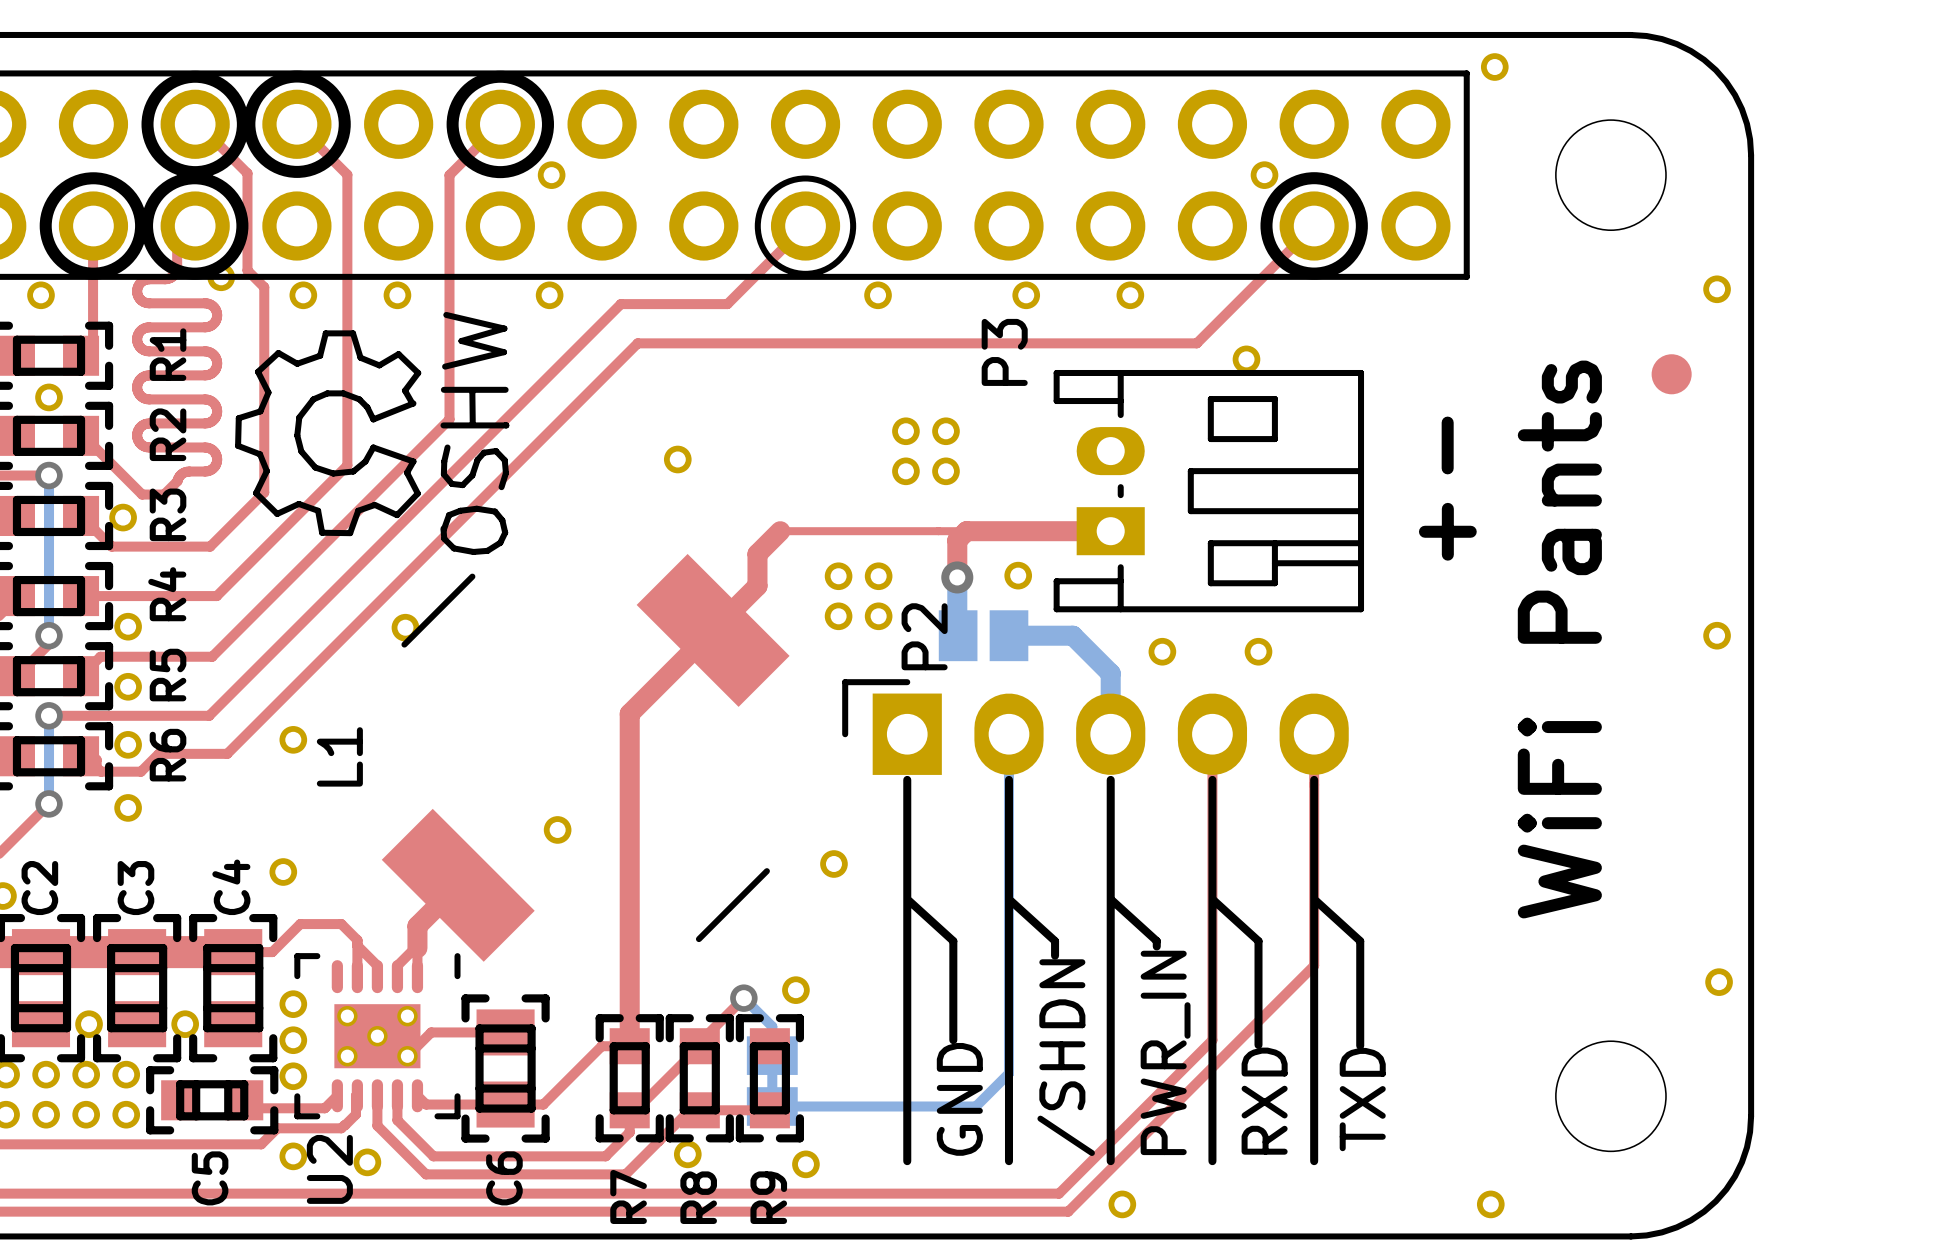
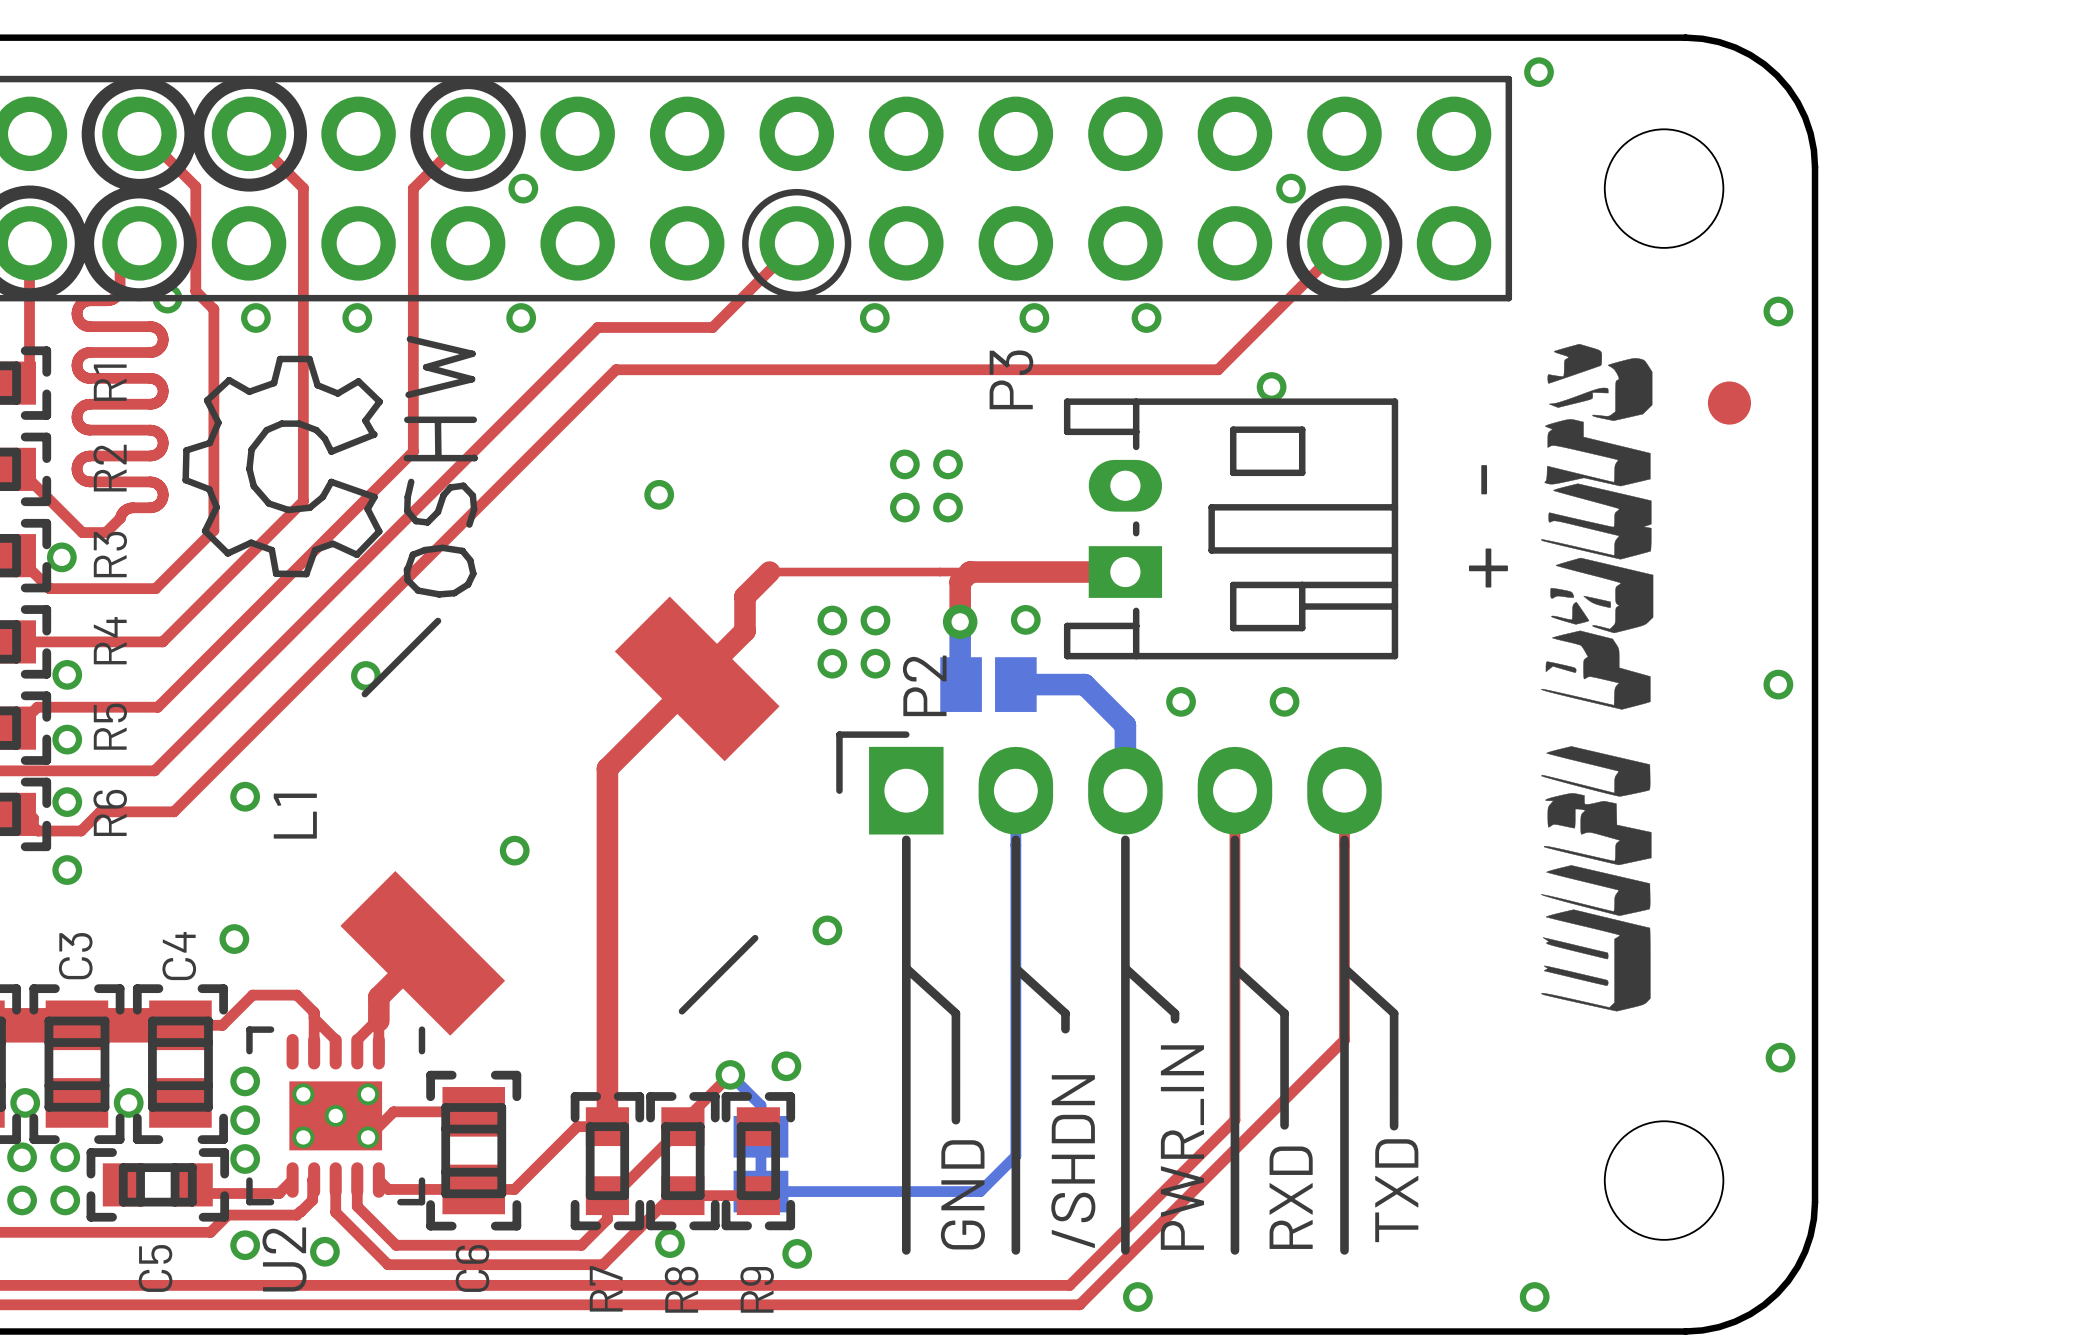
drawing: none -> [1541, 343, 1654, 1012]
text: WiFi Pants (1559, 639) -> none
part position: (557, 829) -> (514, 850)

